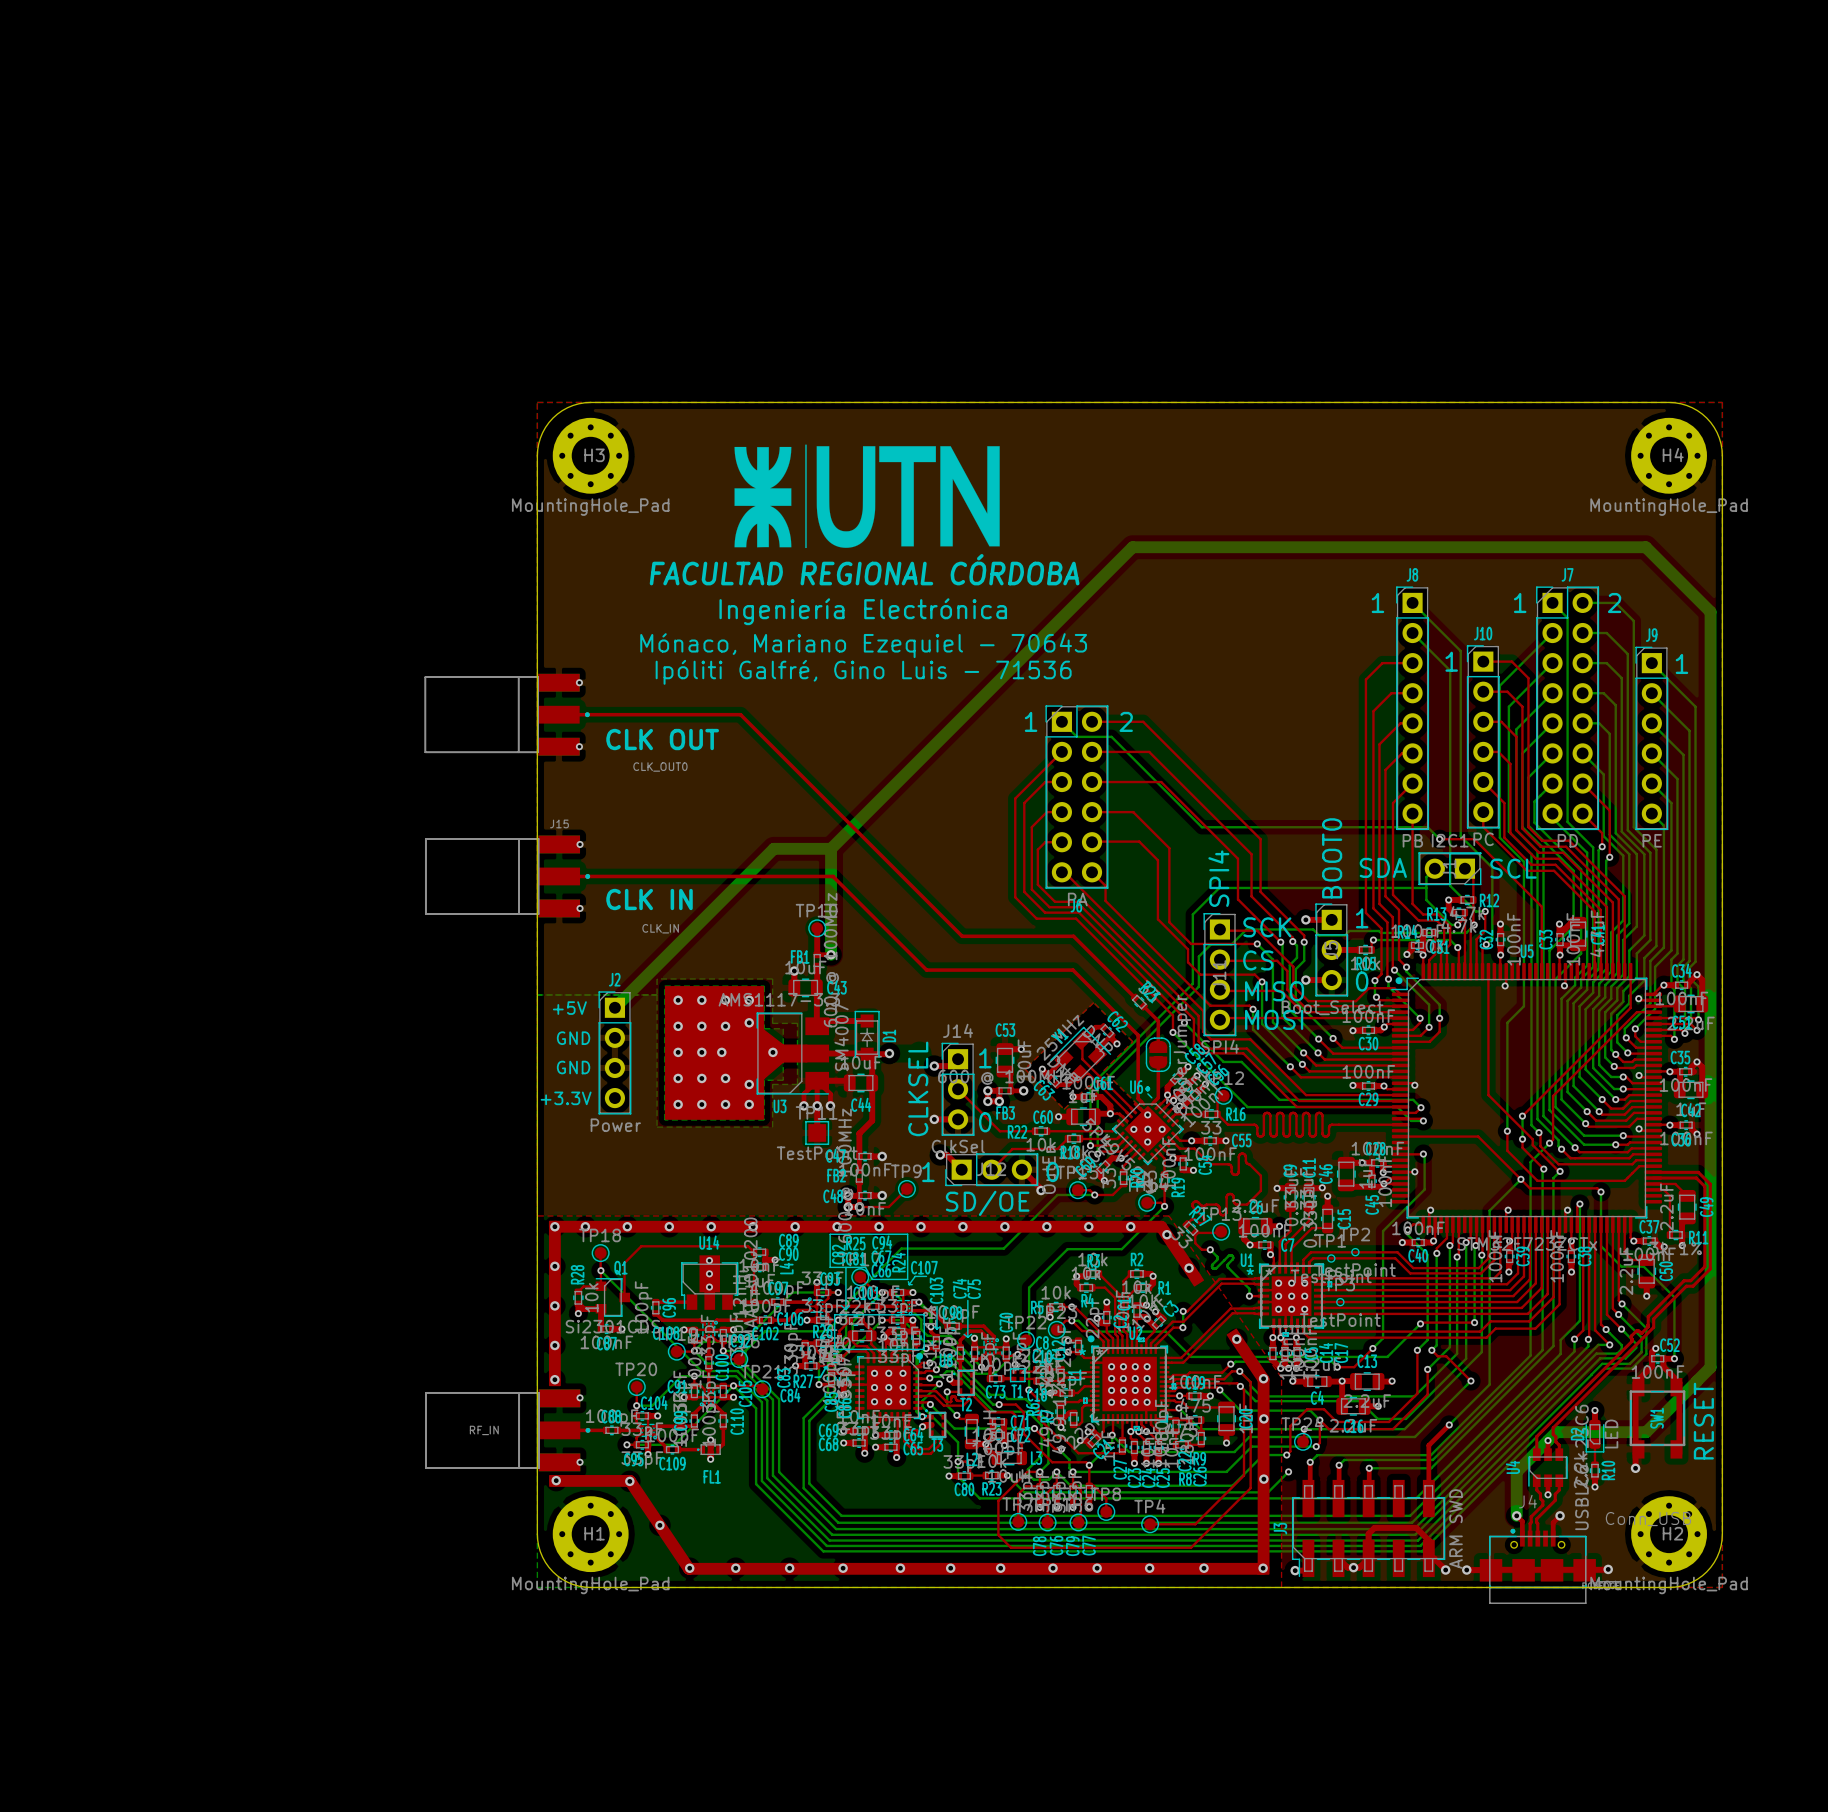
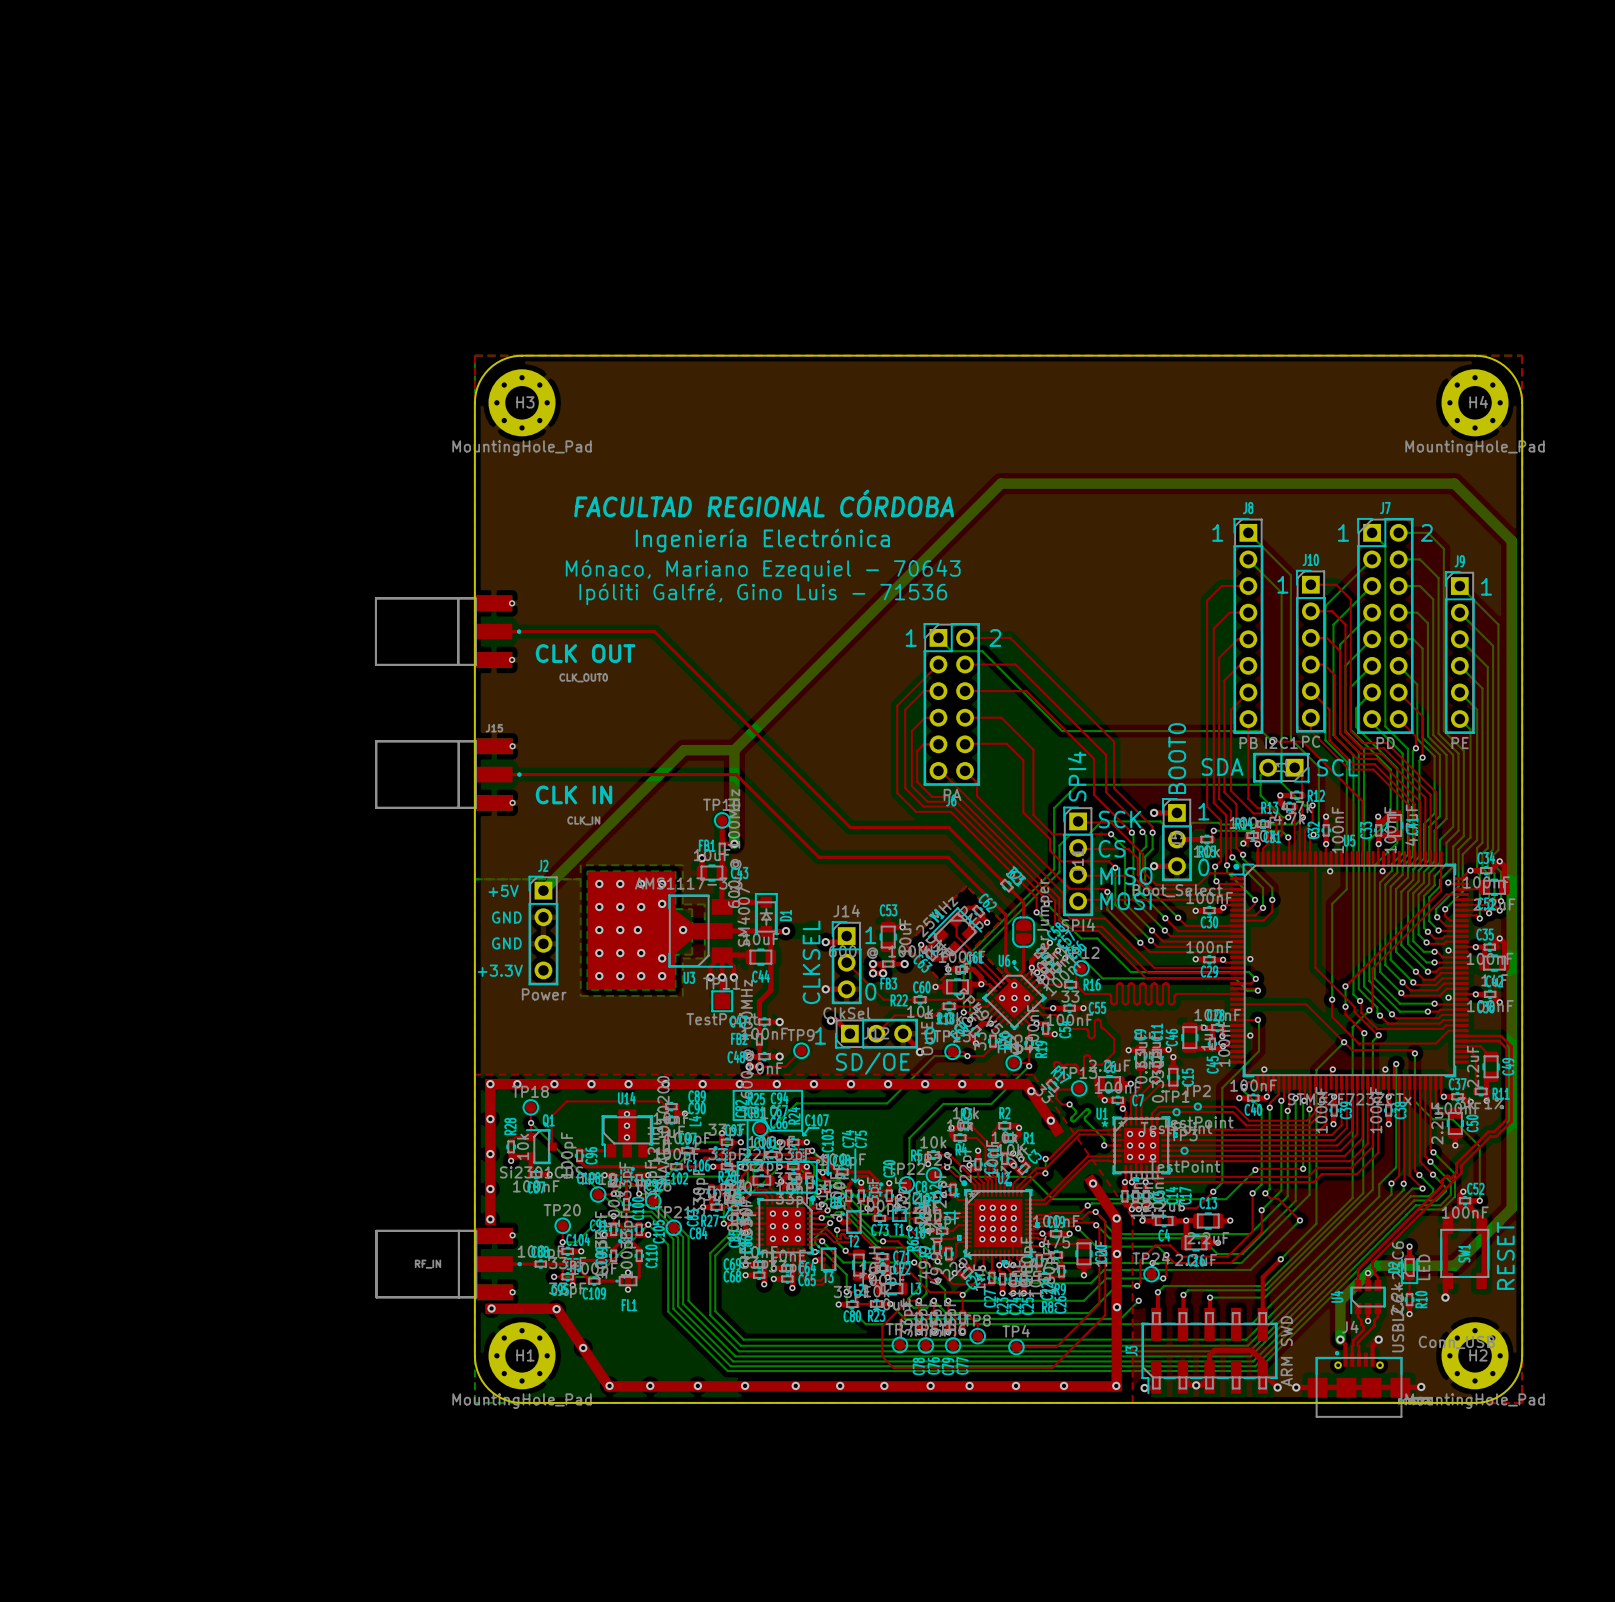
drawing: [734, 444, 1000, 549] -> none

